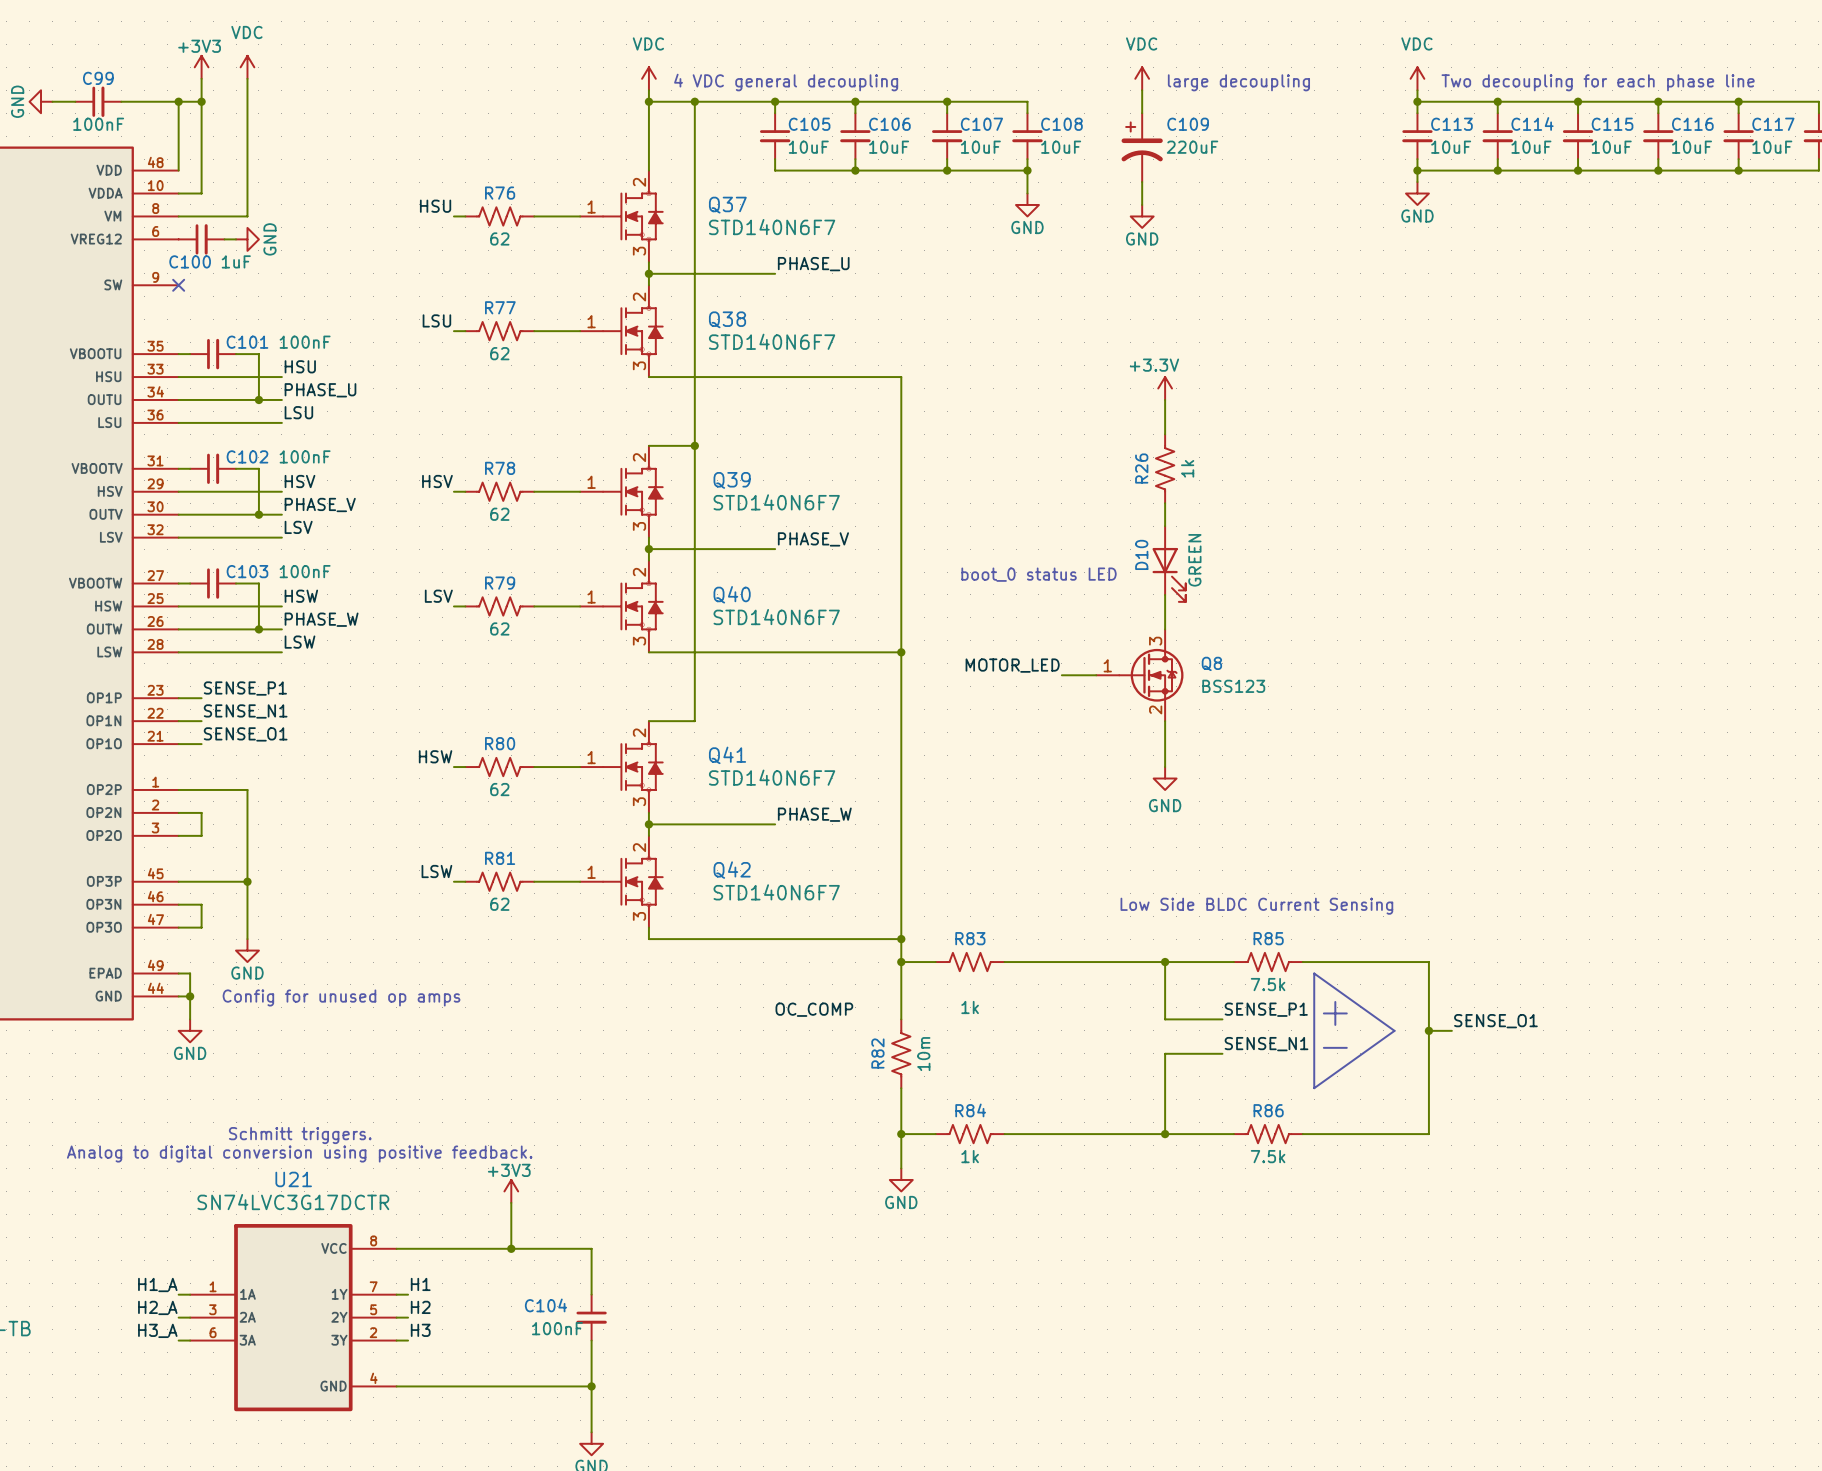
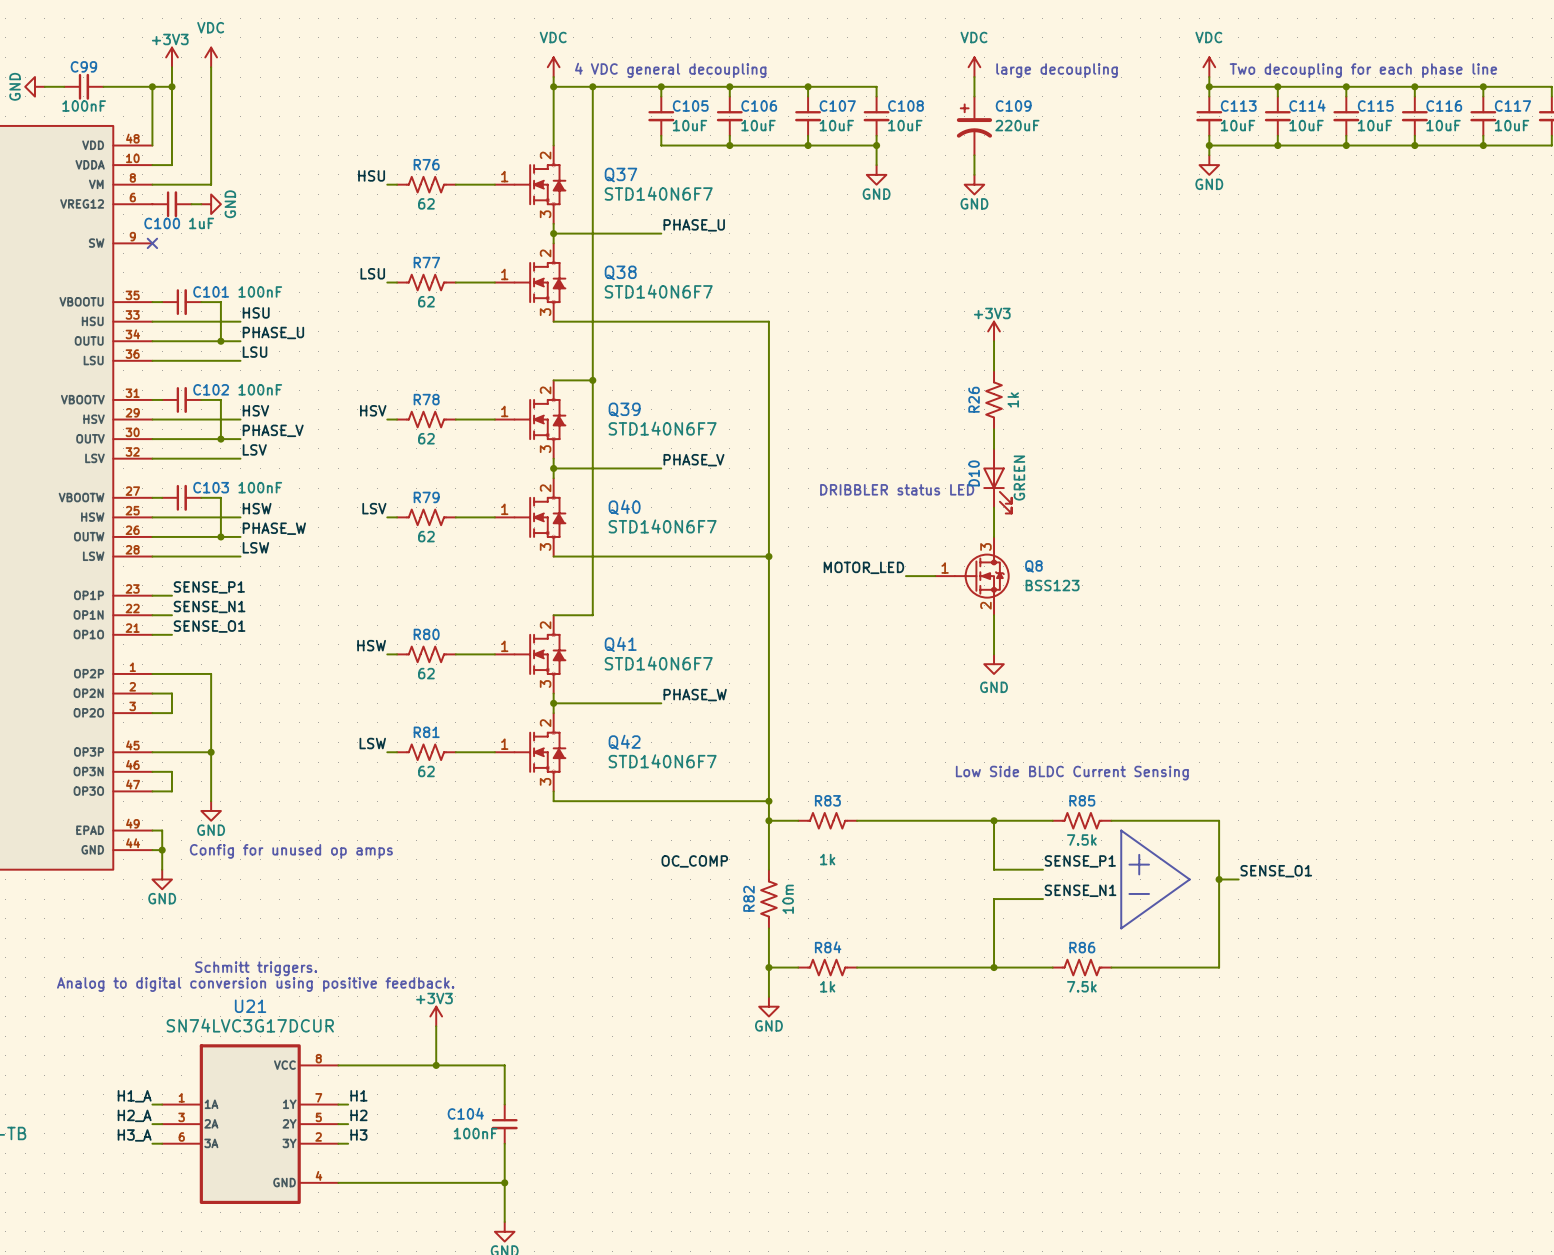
power symbol: +3.3V (1165, 388) -> +3V3 (994, 331)
text: boot_0 status LED (1039, 574) -> DRIBBLER status LED (897, 489)
U21 value: SN74LVC3G17DCTR (293, 1202) -> SN74LVC3G17DCUR (250, 1025)

